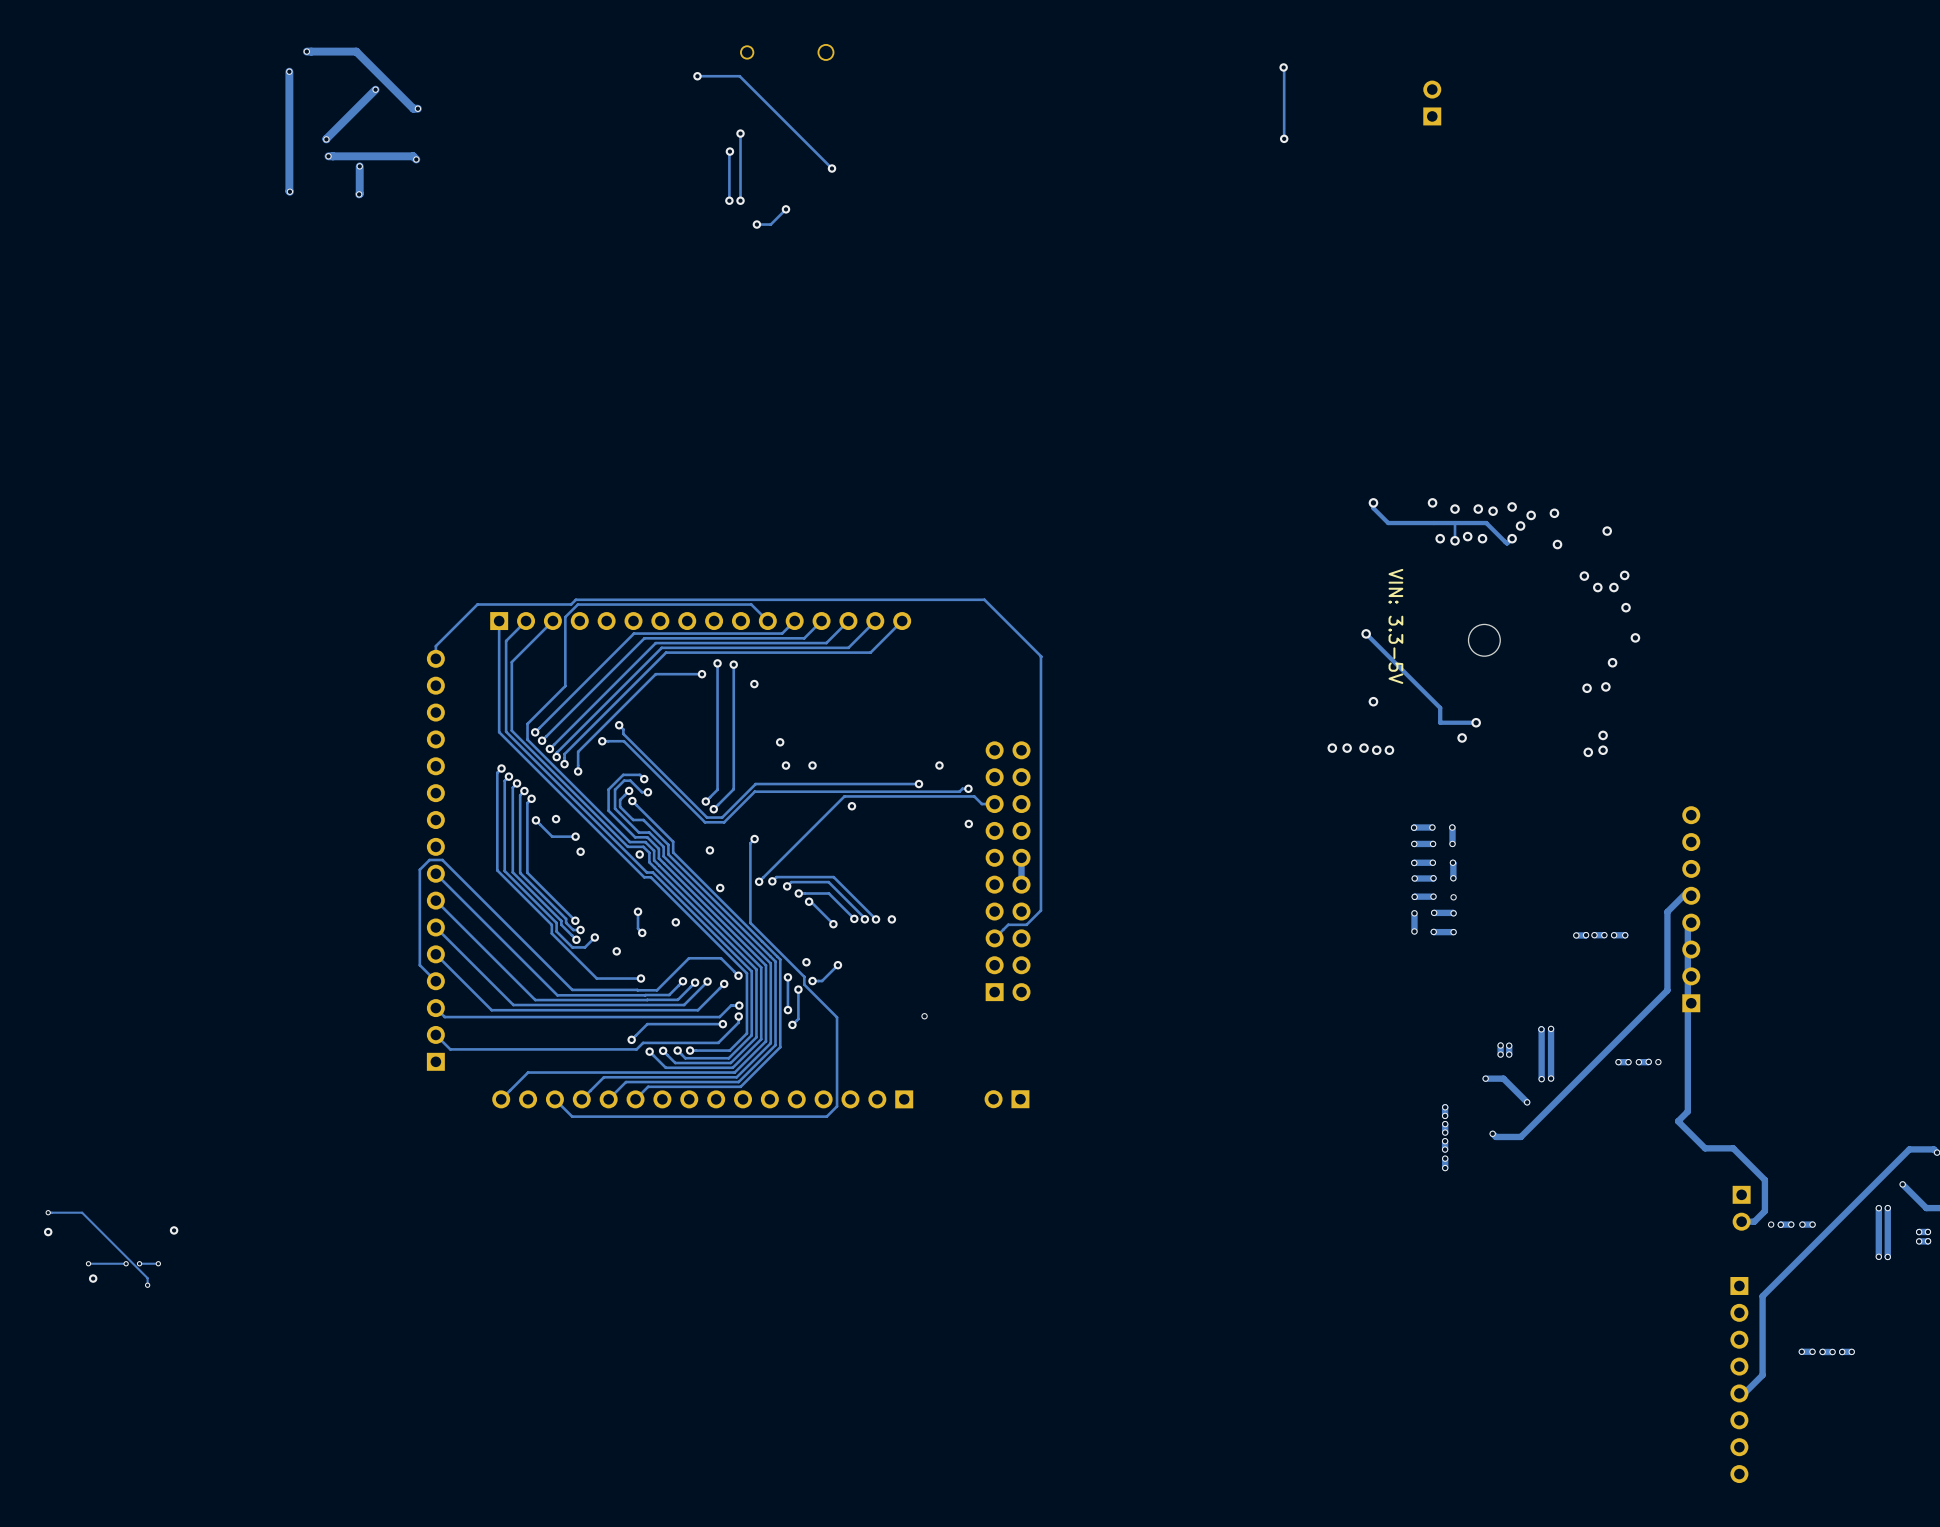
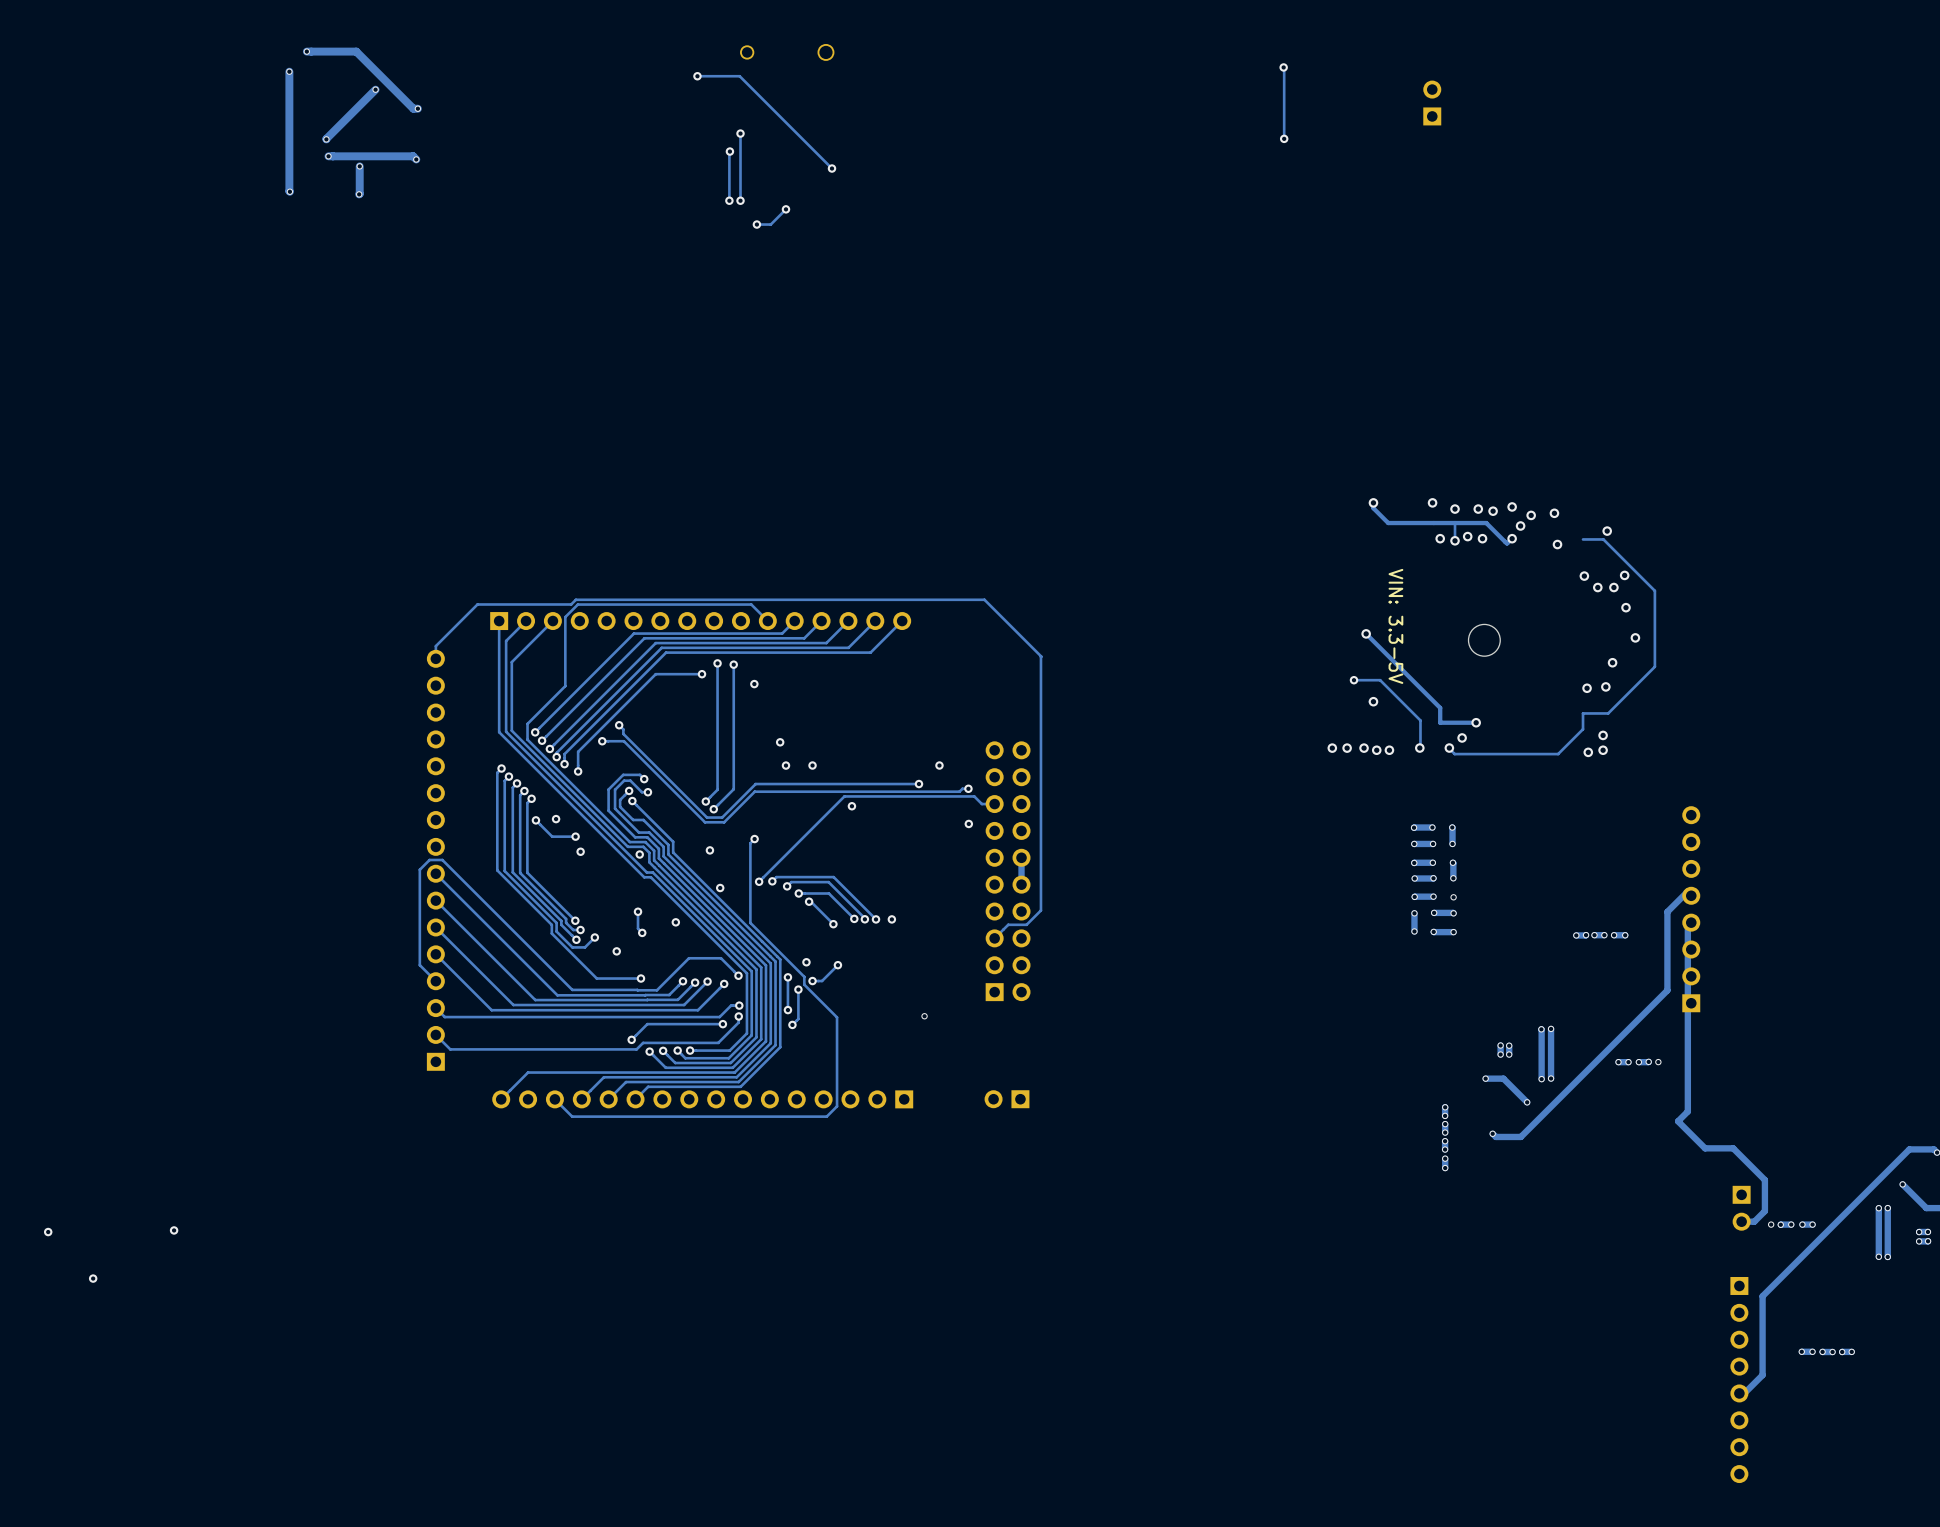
track: none -> (1583, 539) (1603, 539) (1654, 590) (1654, 666) (1608, 713) (1583, 713) (1583, 729) (1558, 754) (1454, 754) (1449, 748)
track: none -> (1353, 680) (1380, 680) (1420, 720) (1419, 748)
via: none -> (1353, 680)
via: none -> (1419, 748)
via: none -> (1449, 748)
track: (48, 1212) (82, 1212) (147, 1278) (147, 1285) -> none
via: (48, 1212) -> none
via: (88, 1263) -> none
track: (126, 1263) (88, 1263) -> none
via: (126, 1263) -> none
via: (139, 1263) -> none
track: (158, 1263) (139, 1263) -> none
via: (158, 1263) -> none
via: (147, 1285) -> none

